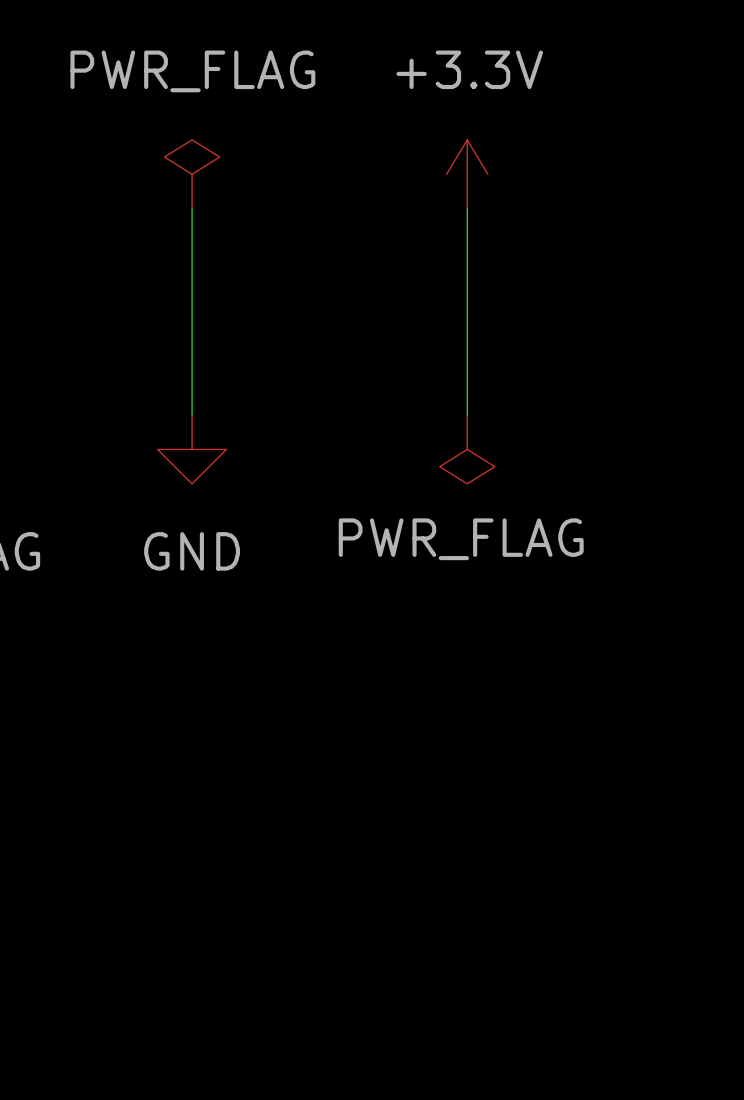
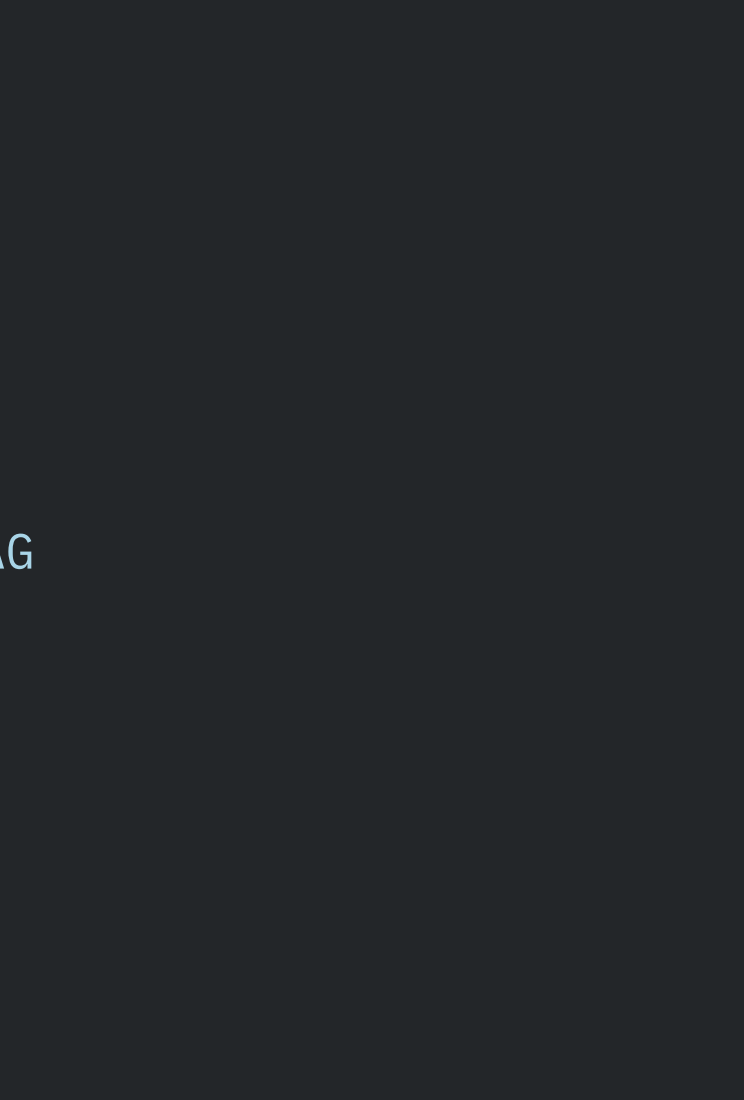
power symbol: PWR_FLAG (192, 174) -> none
power symbol: +3.3V (467, 174) -> none
wire: (192, 208) (192, 415) -> none
wire: (467, 208) (467, 415) -> none
power symbol: GND (192, 449) -> none
power symbol: PWR_FLAG (467, 449) -> none

